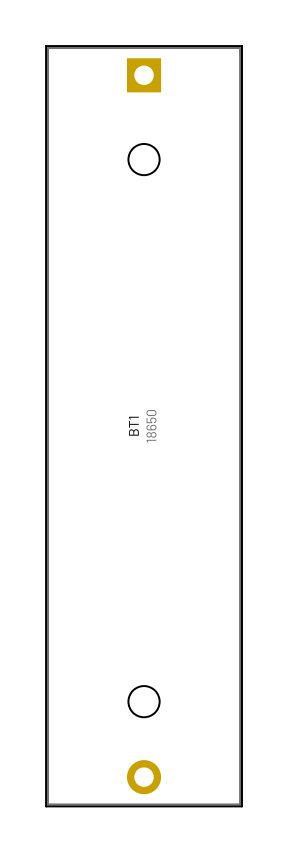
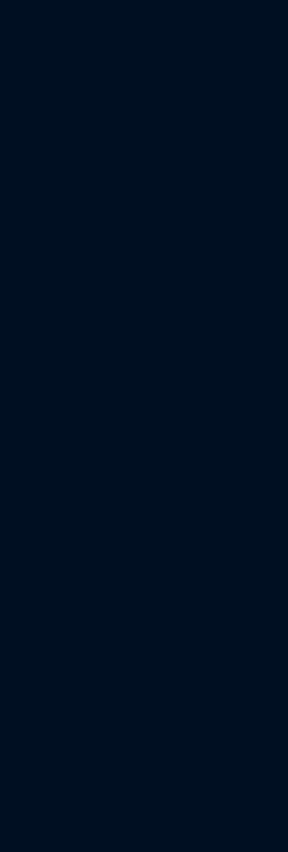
BT1: 18650 (144, 426) -> none

